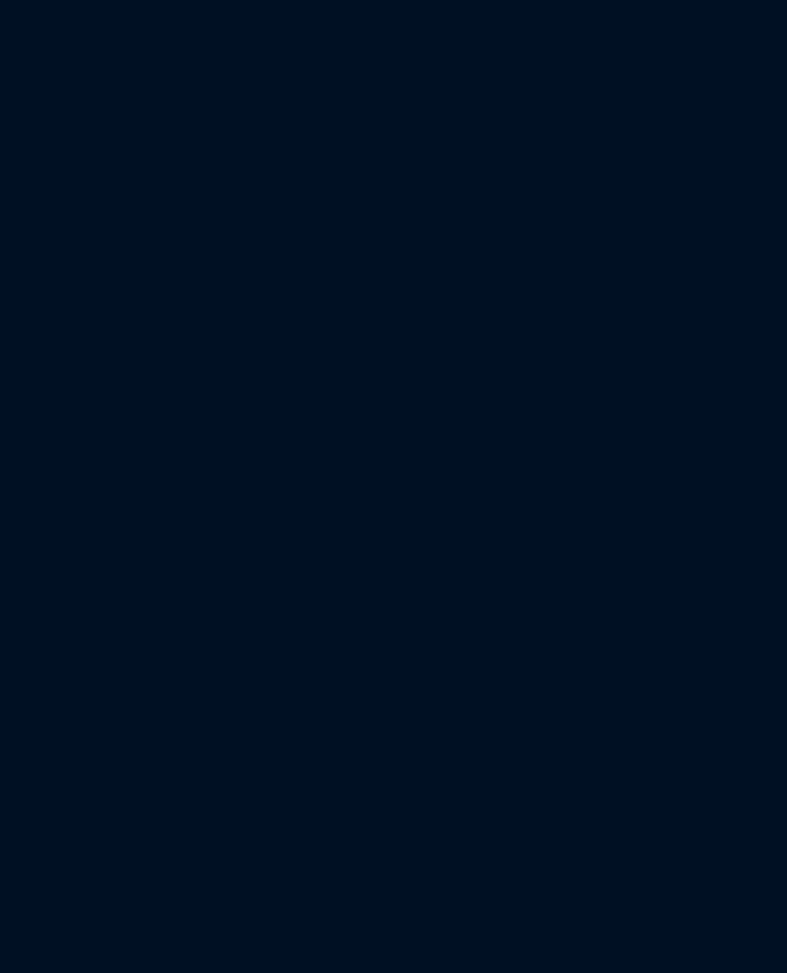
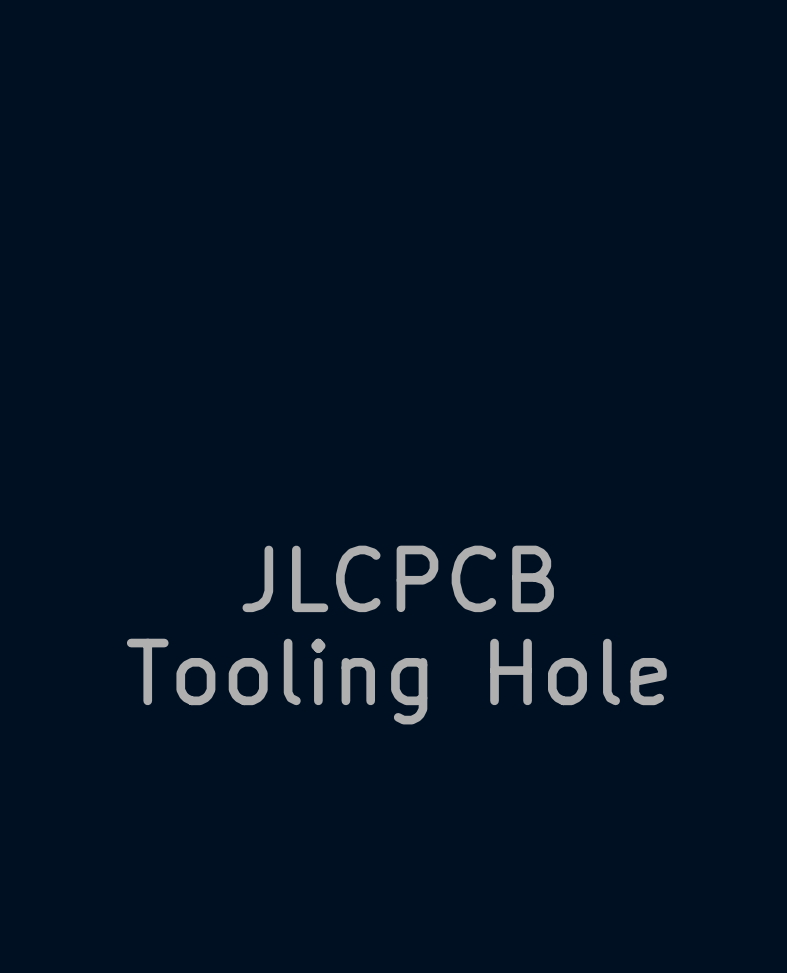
text: none -> JLCPCB (398, 578)
text: none -> Tooling Hole (396, 681)

